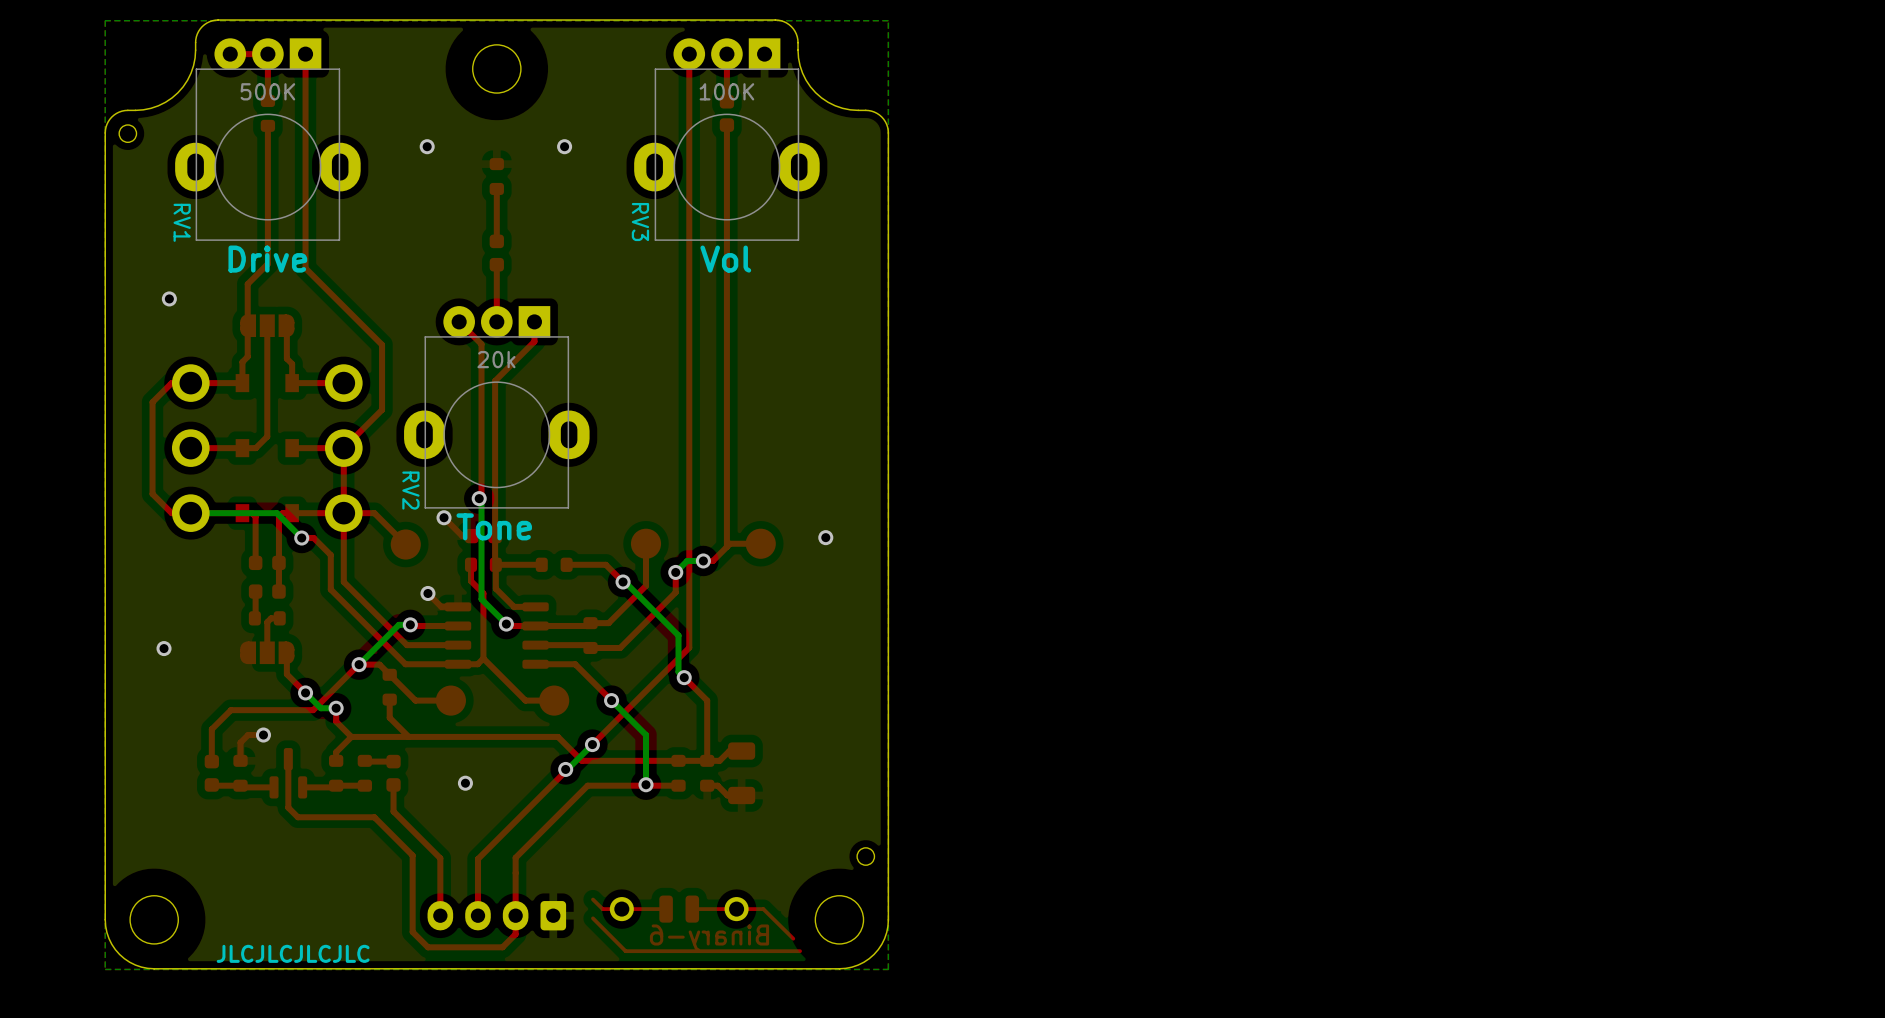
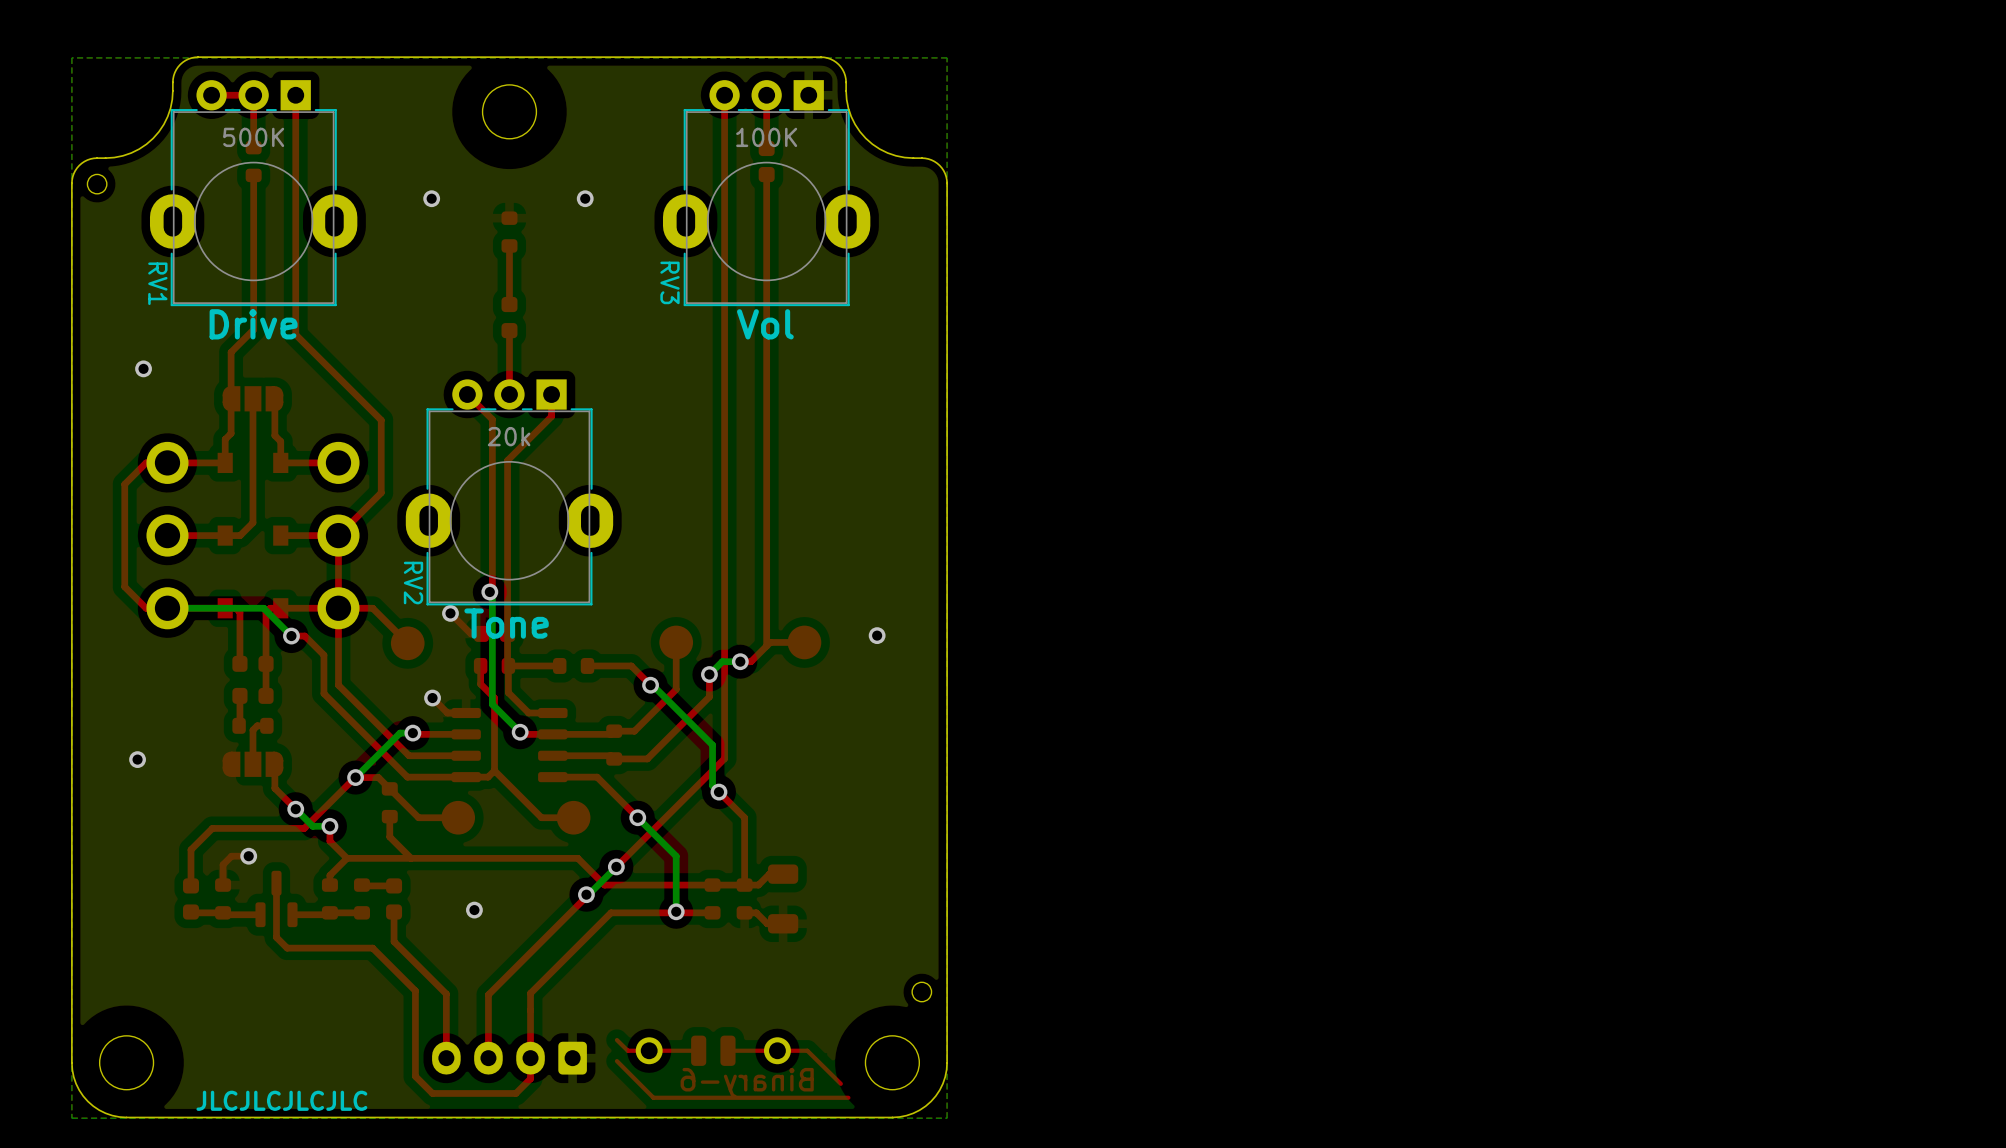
RV1 footprint: [175, 38, 361, 241] -> [149, 80, 358, 307]
RV3 footprint: [634, 38, 820, 241] -> [662, 80, 871, 307]
RV2 footprint: [404, 306, 590, 509] -> [405, 379, 614, 606]

